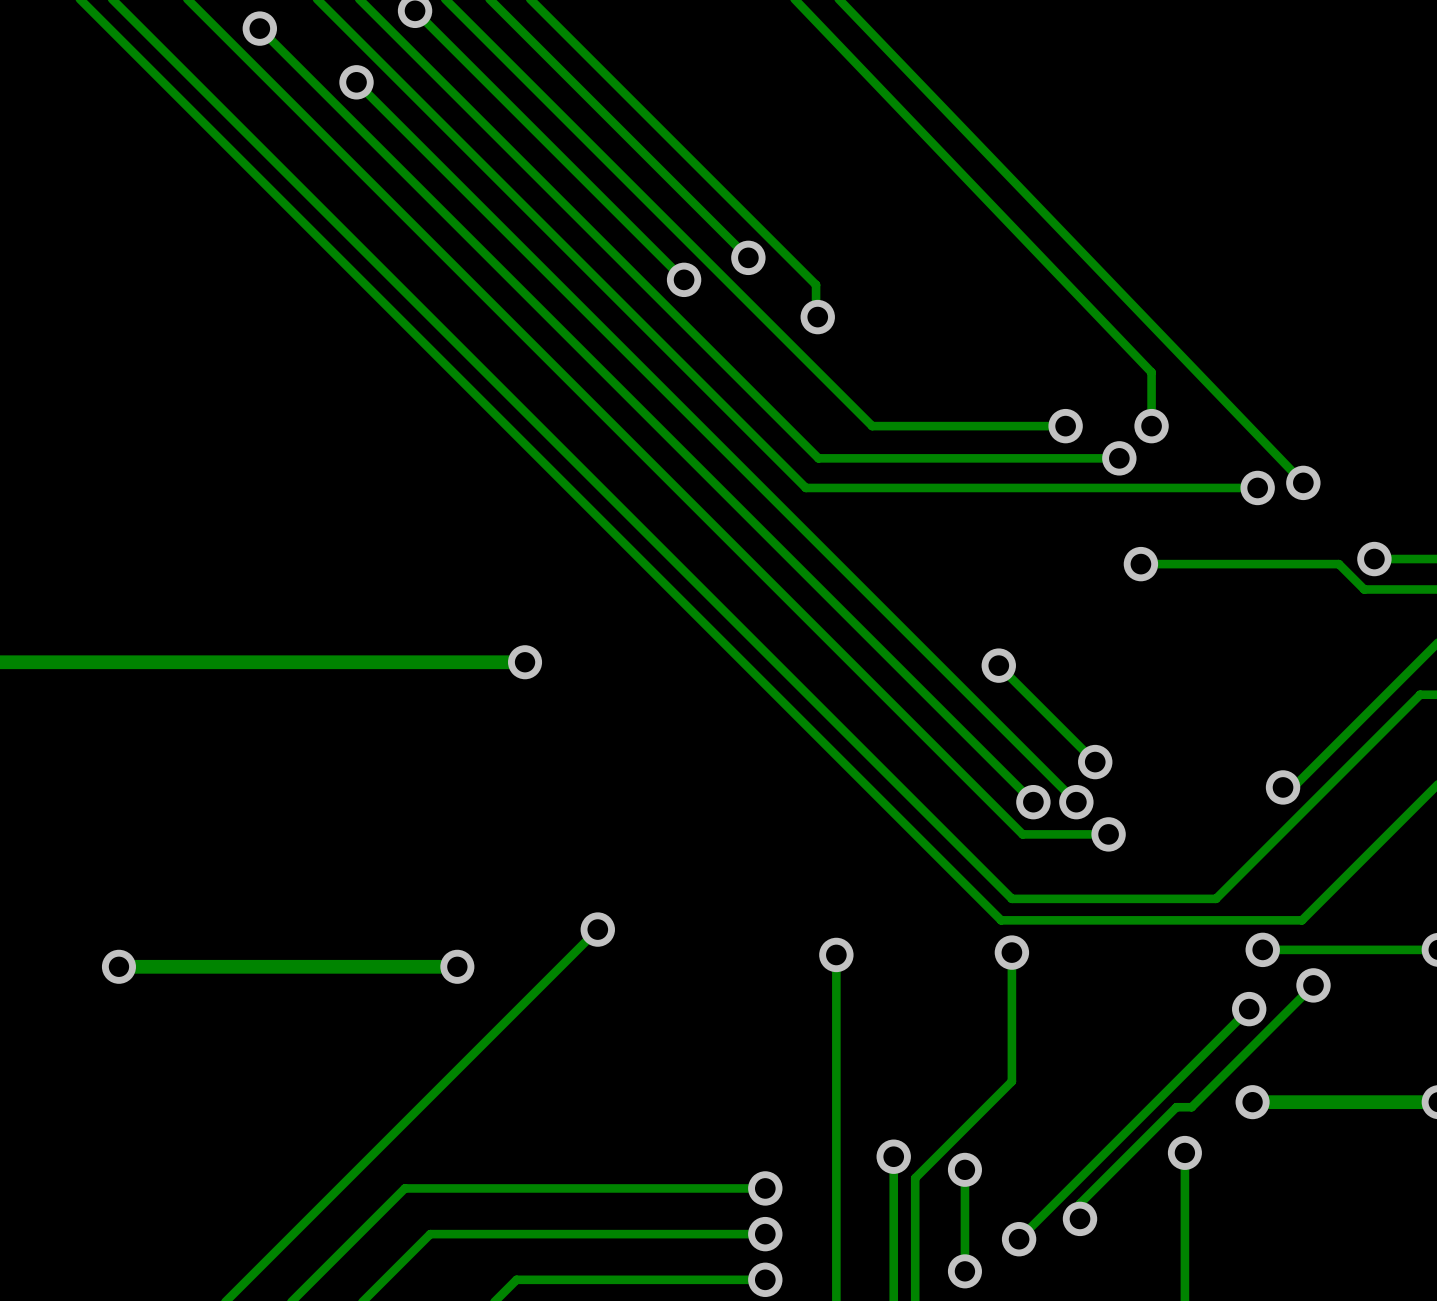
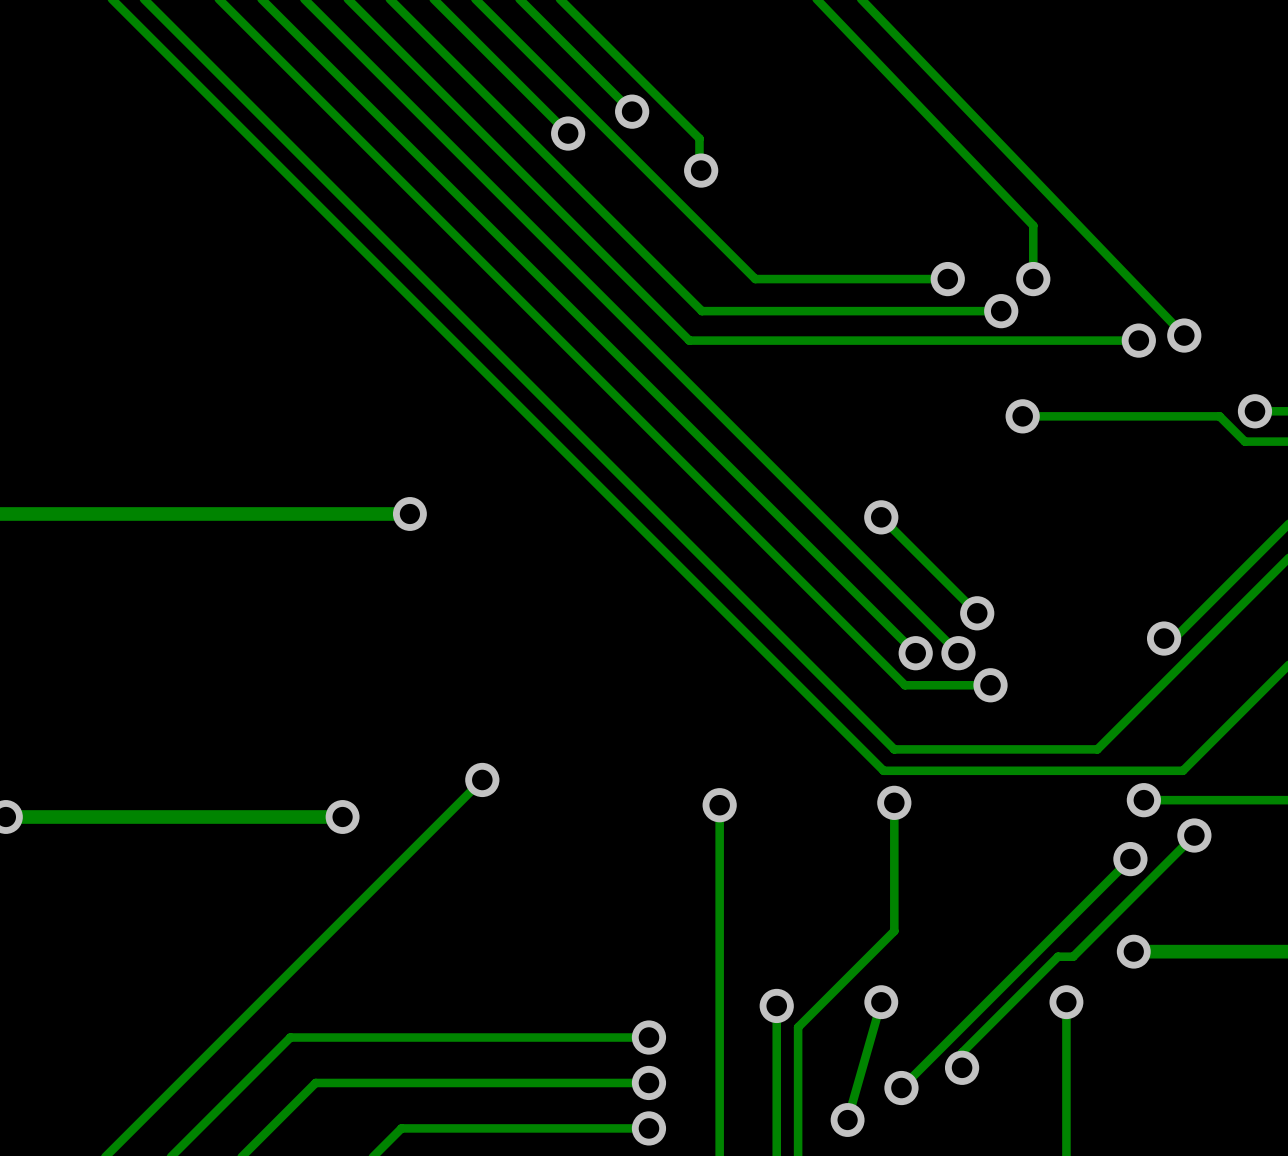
track: (964, 1169) (964, 1271) -> (881, 1002) (847, 1120)
via position: (964, 1169) -> (881, 1002)

